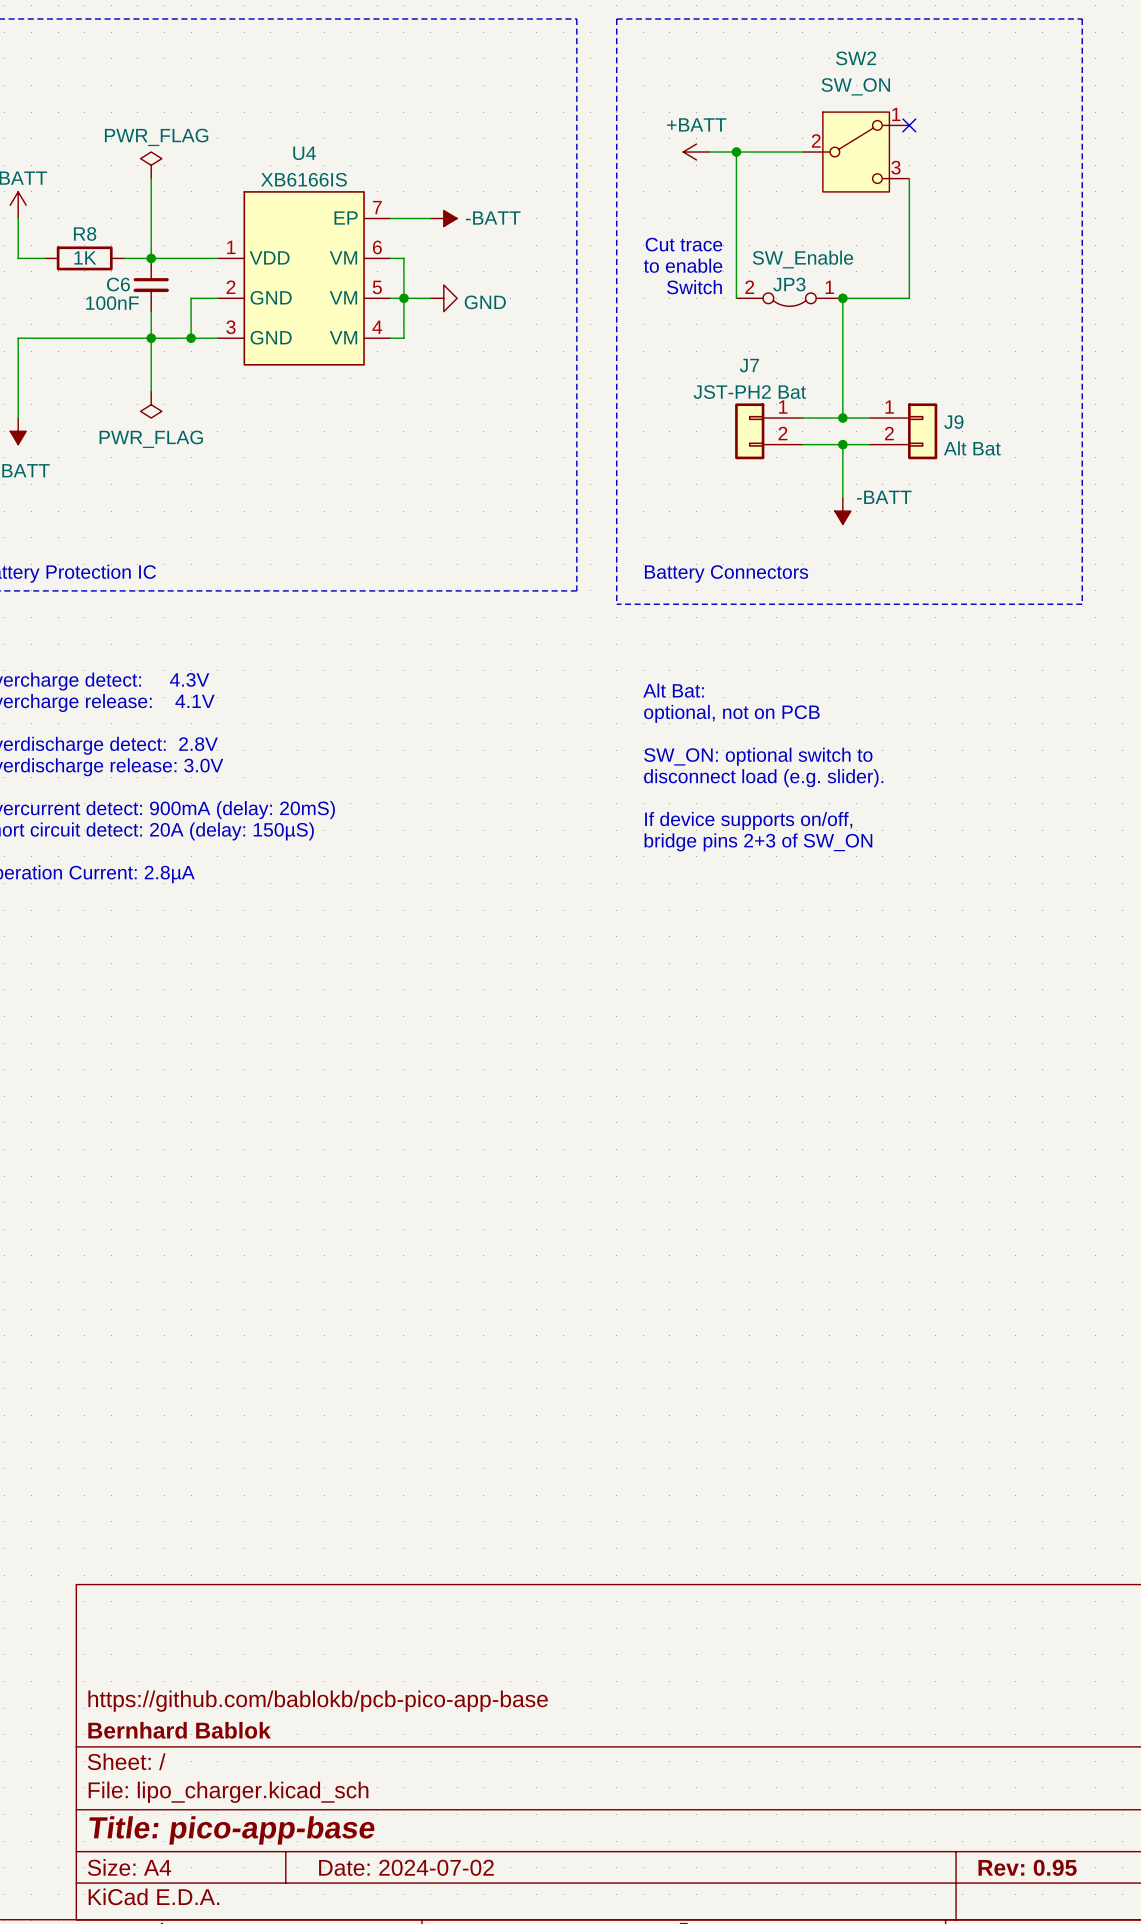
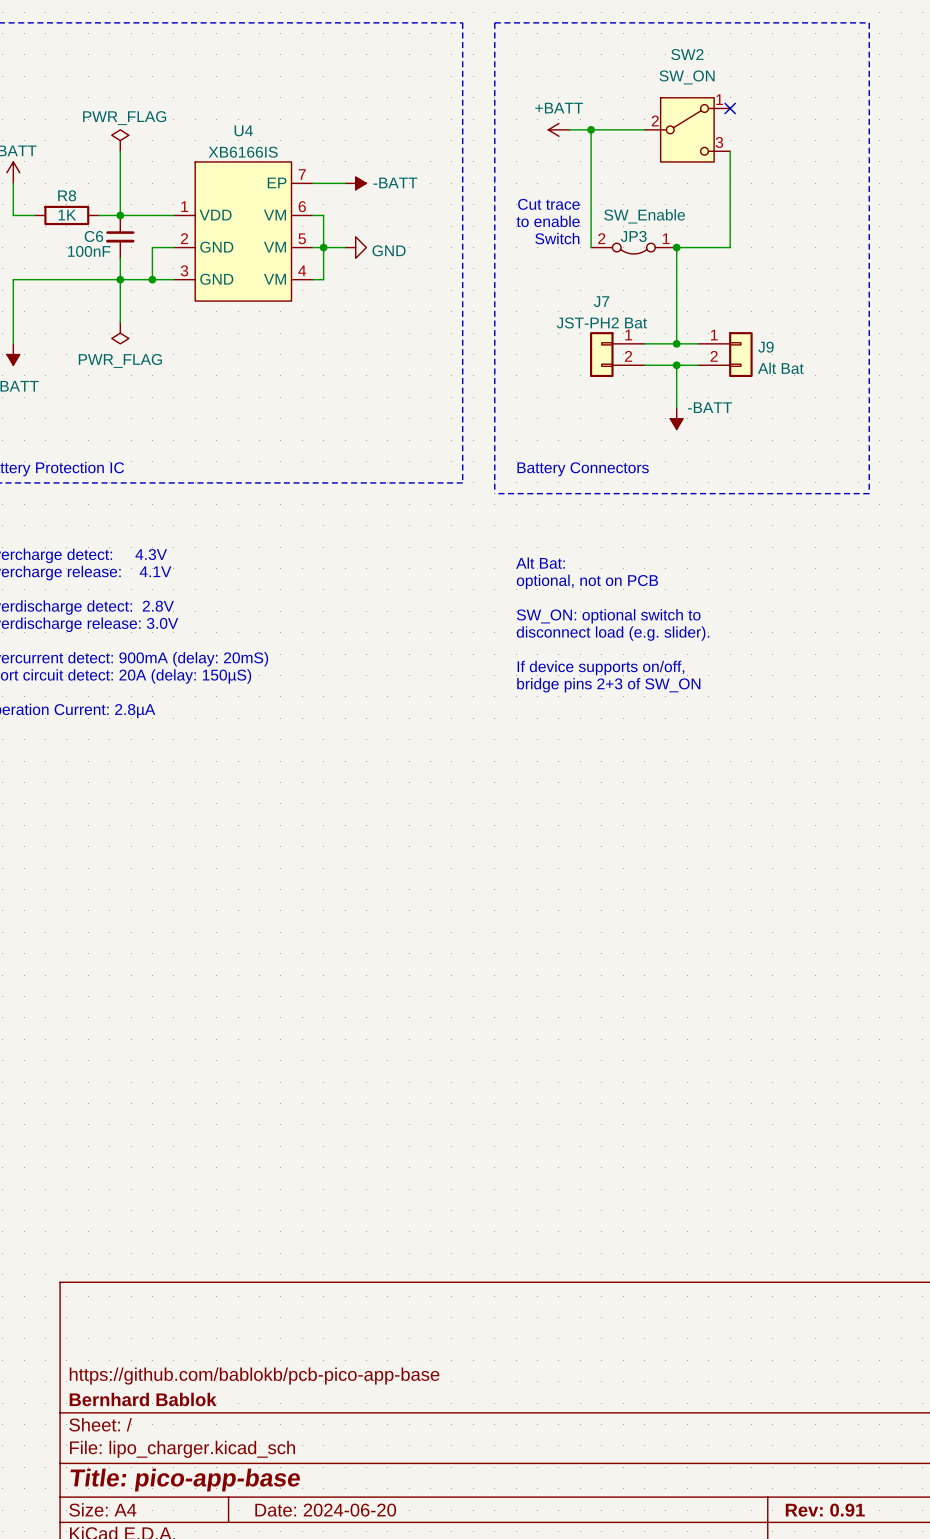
title block: Date: 2024-07-02 (406, 1867) -> Date: 2024-06-20 (325, 1510)
title block: Rev: 0.95 (1027, 1867) -> Rev: 0.91 (825, 1510)

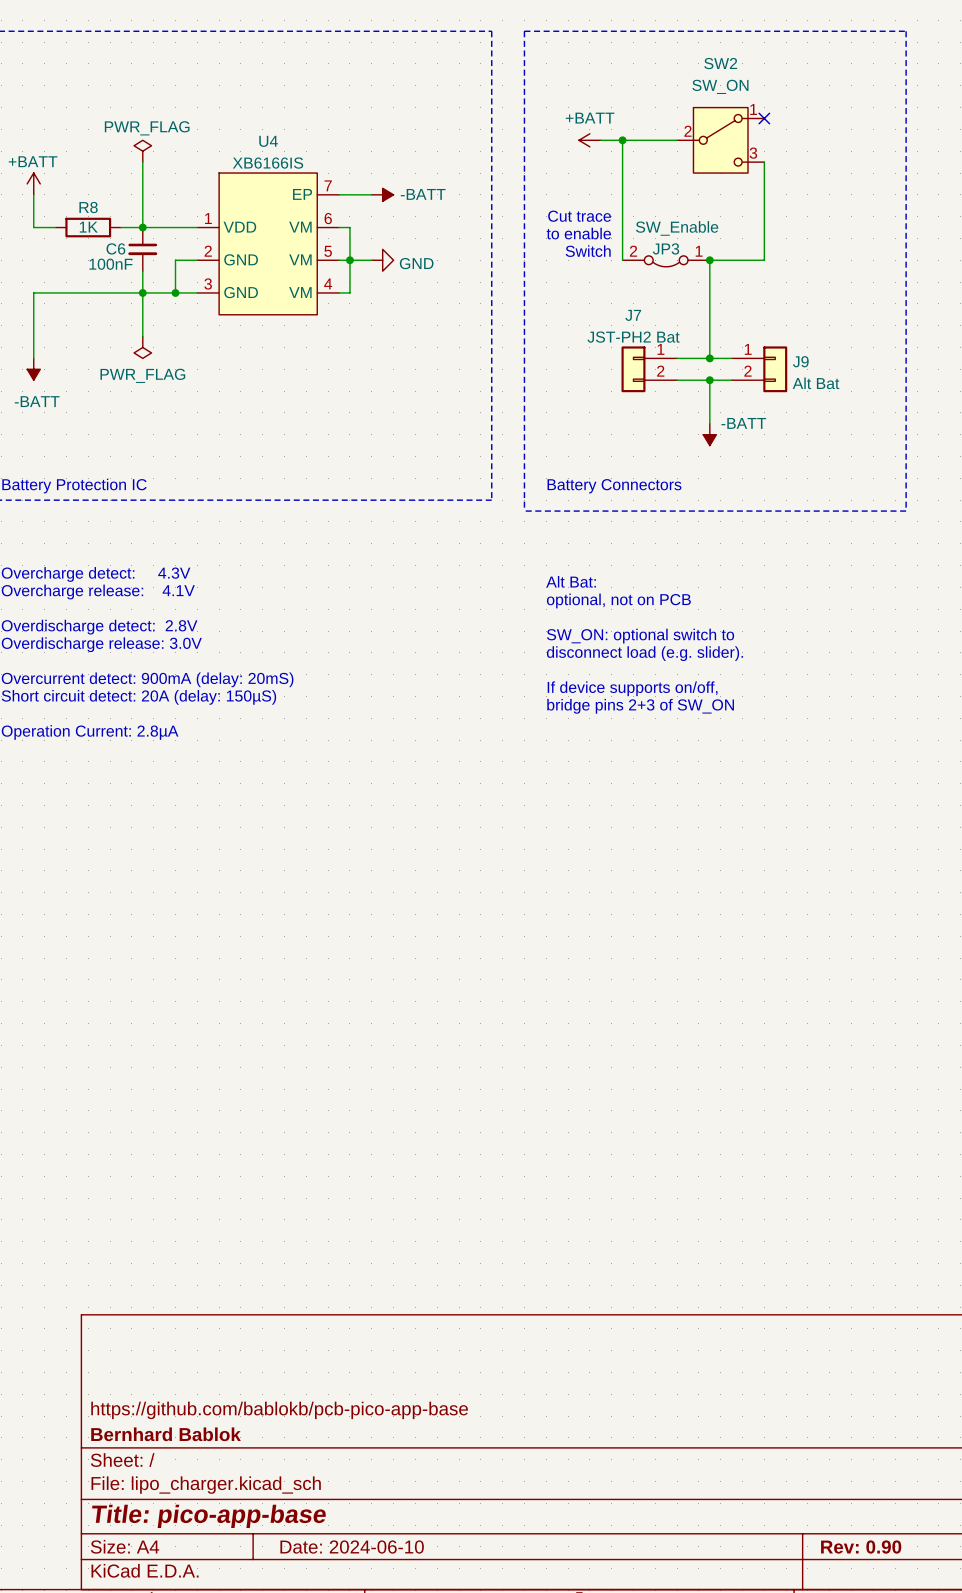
title block: Date: 2024-06-20 (325, 1510) -> Date: 2024-06-10 (352, 1547)
title block: Rev: 0.91 (825, 1510) -> Rev: 0.90 (861, 1547)

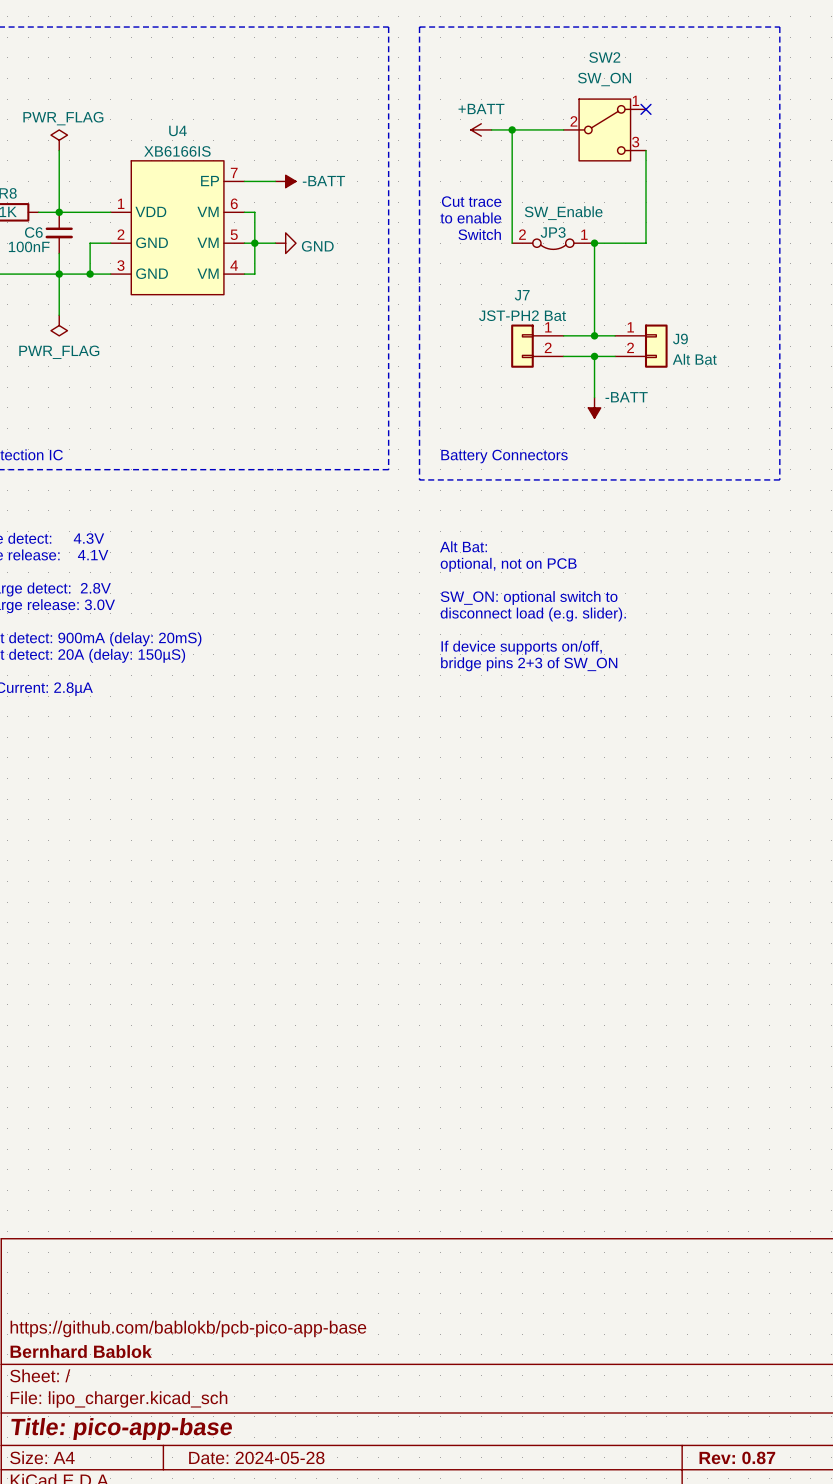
title block: Date: 2024-06-10 (352, 1547) -> Date: 2024-05-28 (256, 1457)
title block: Rev: 0.90 (861, 1547) -> Rev: 0.87 (737, 1457)

